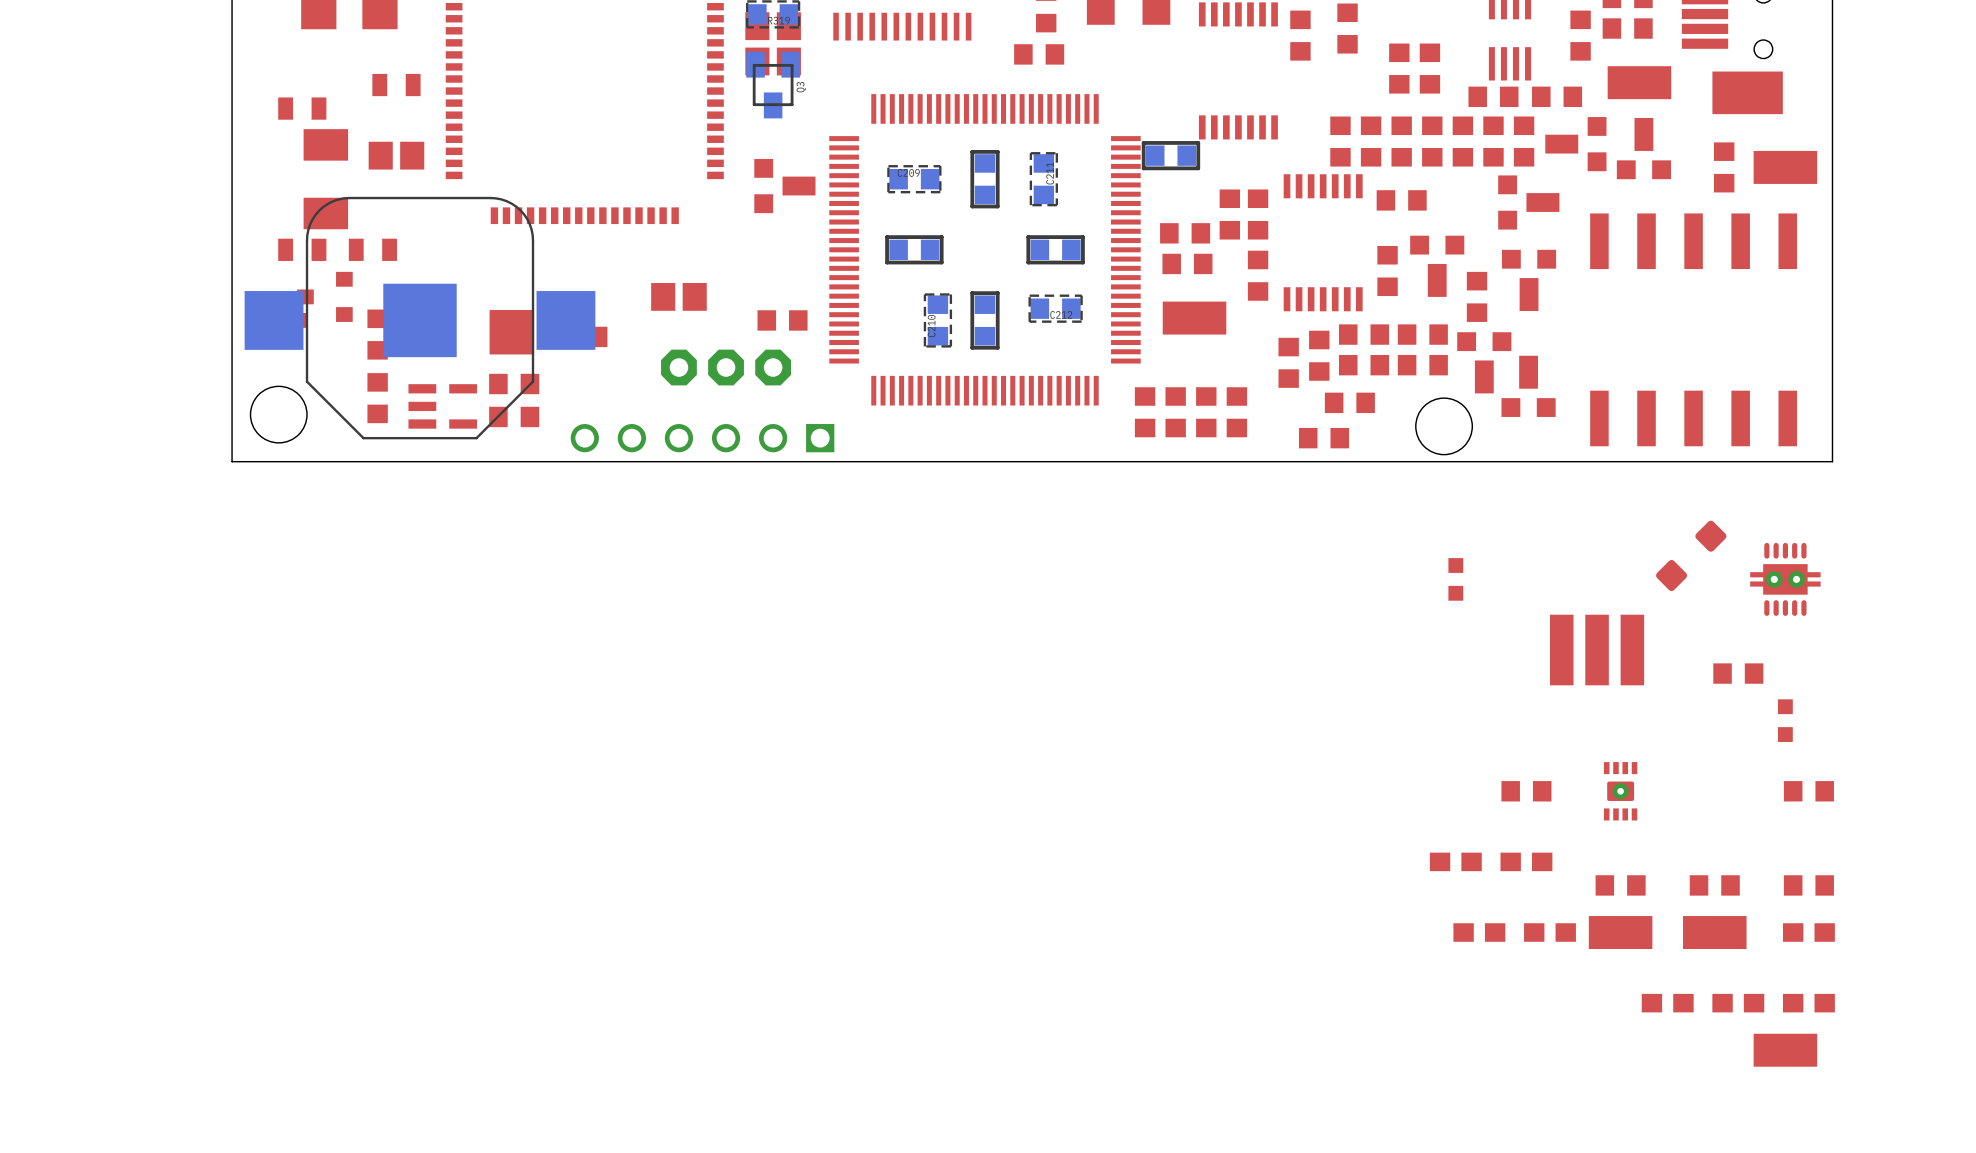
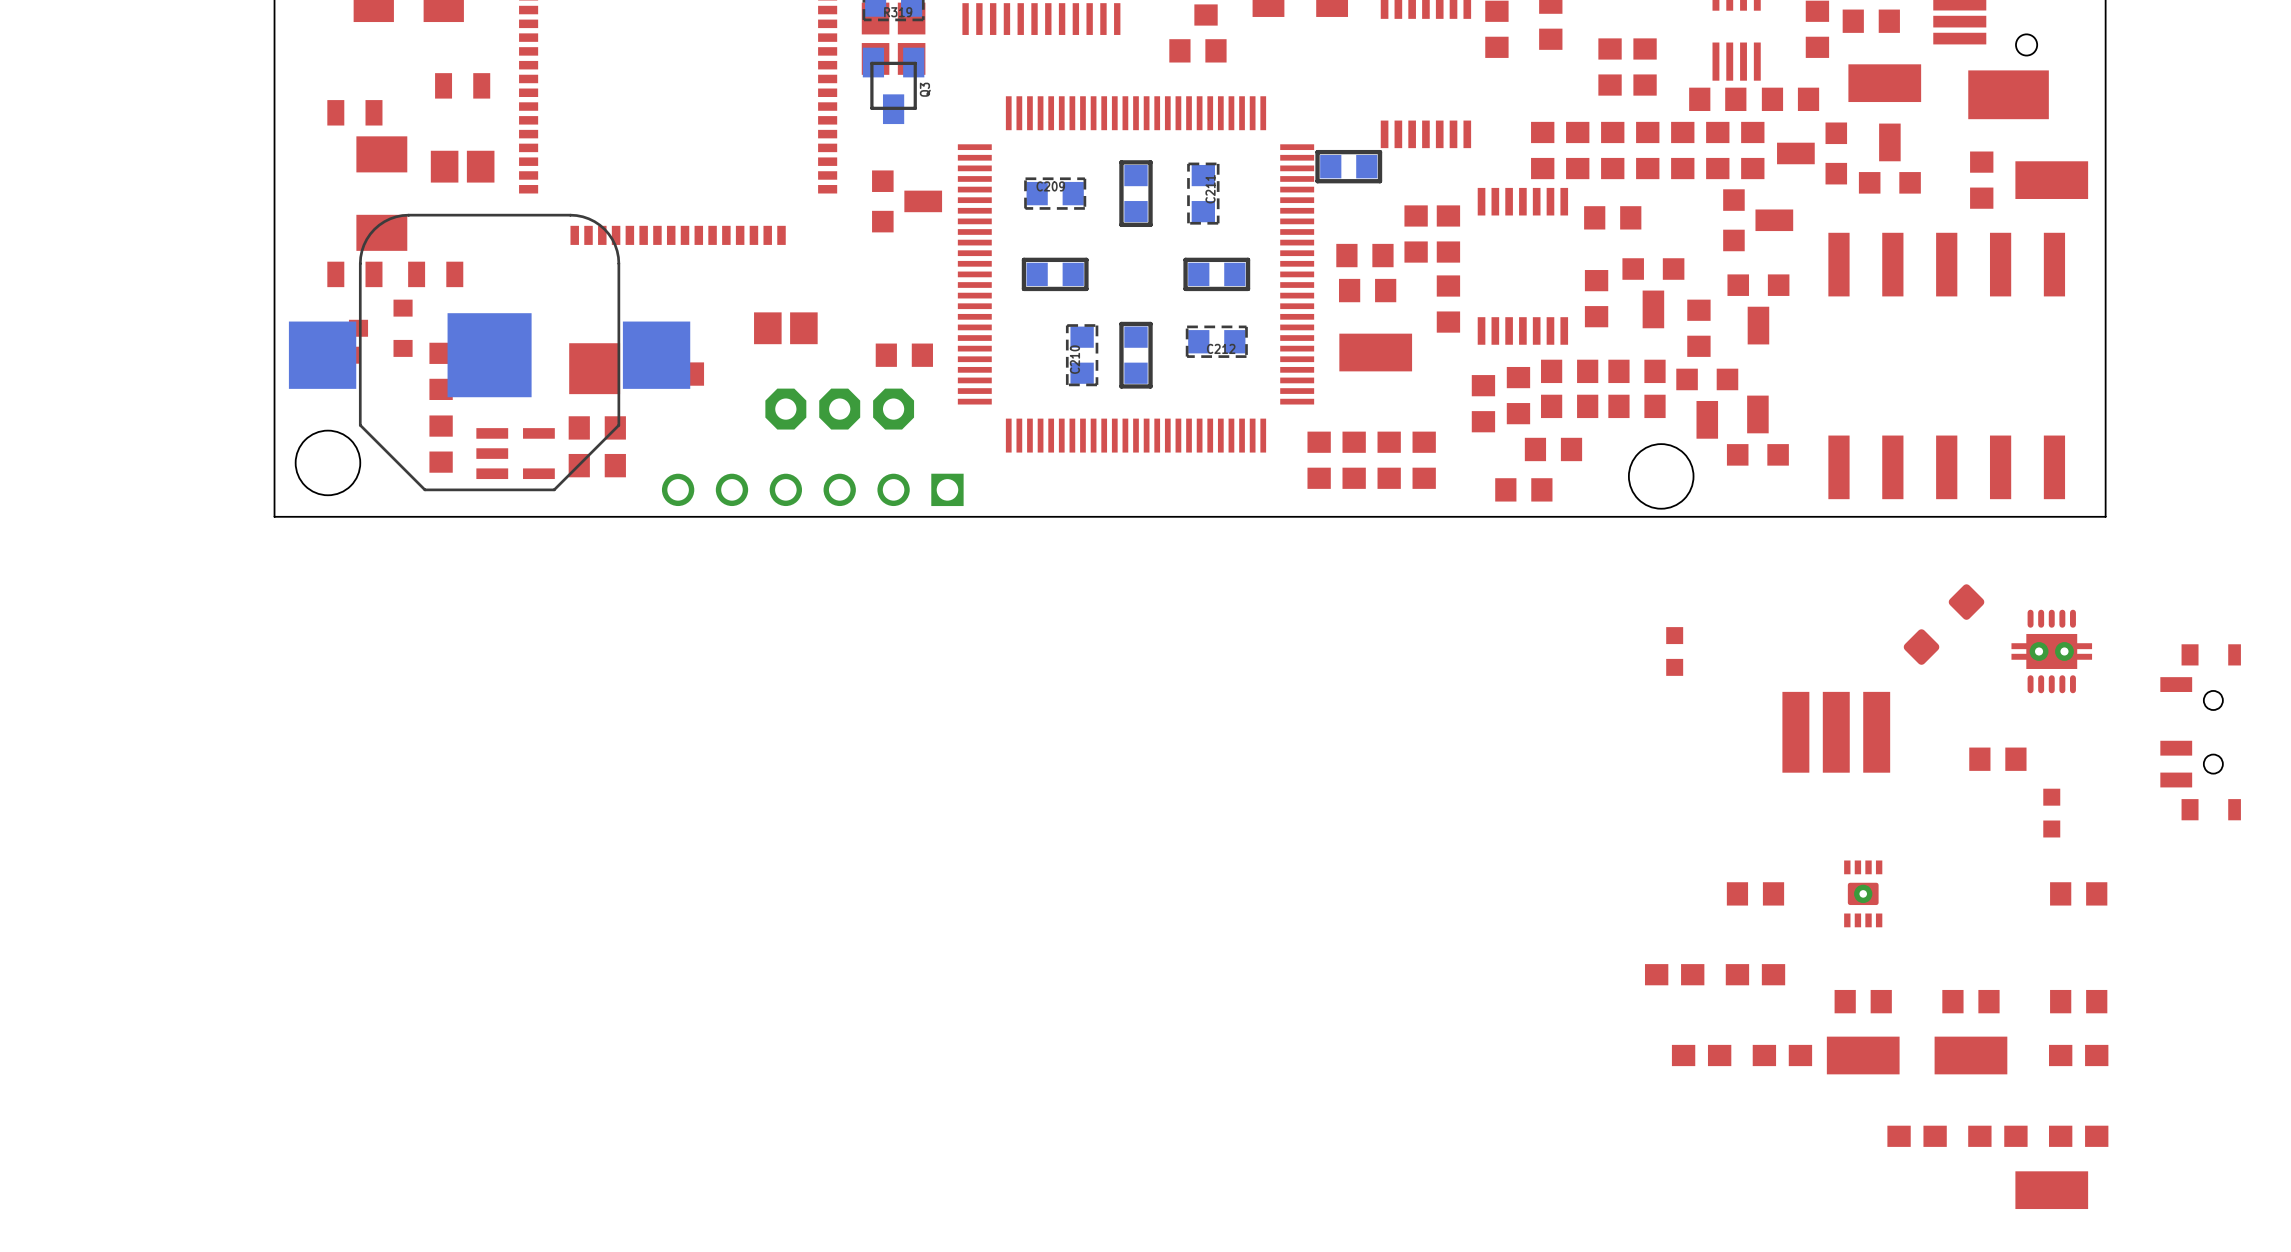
part: none -> (2200, 732)

